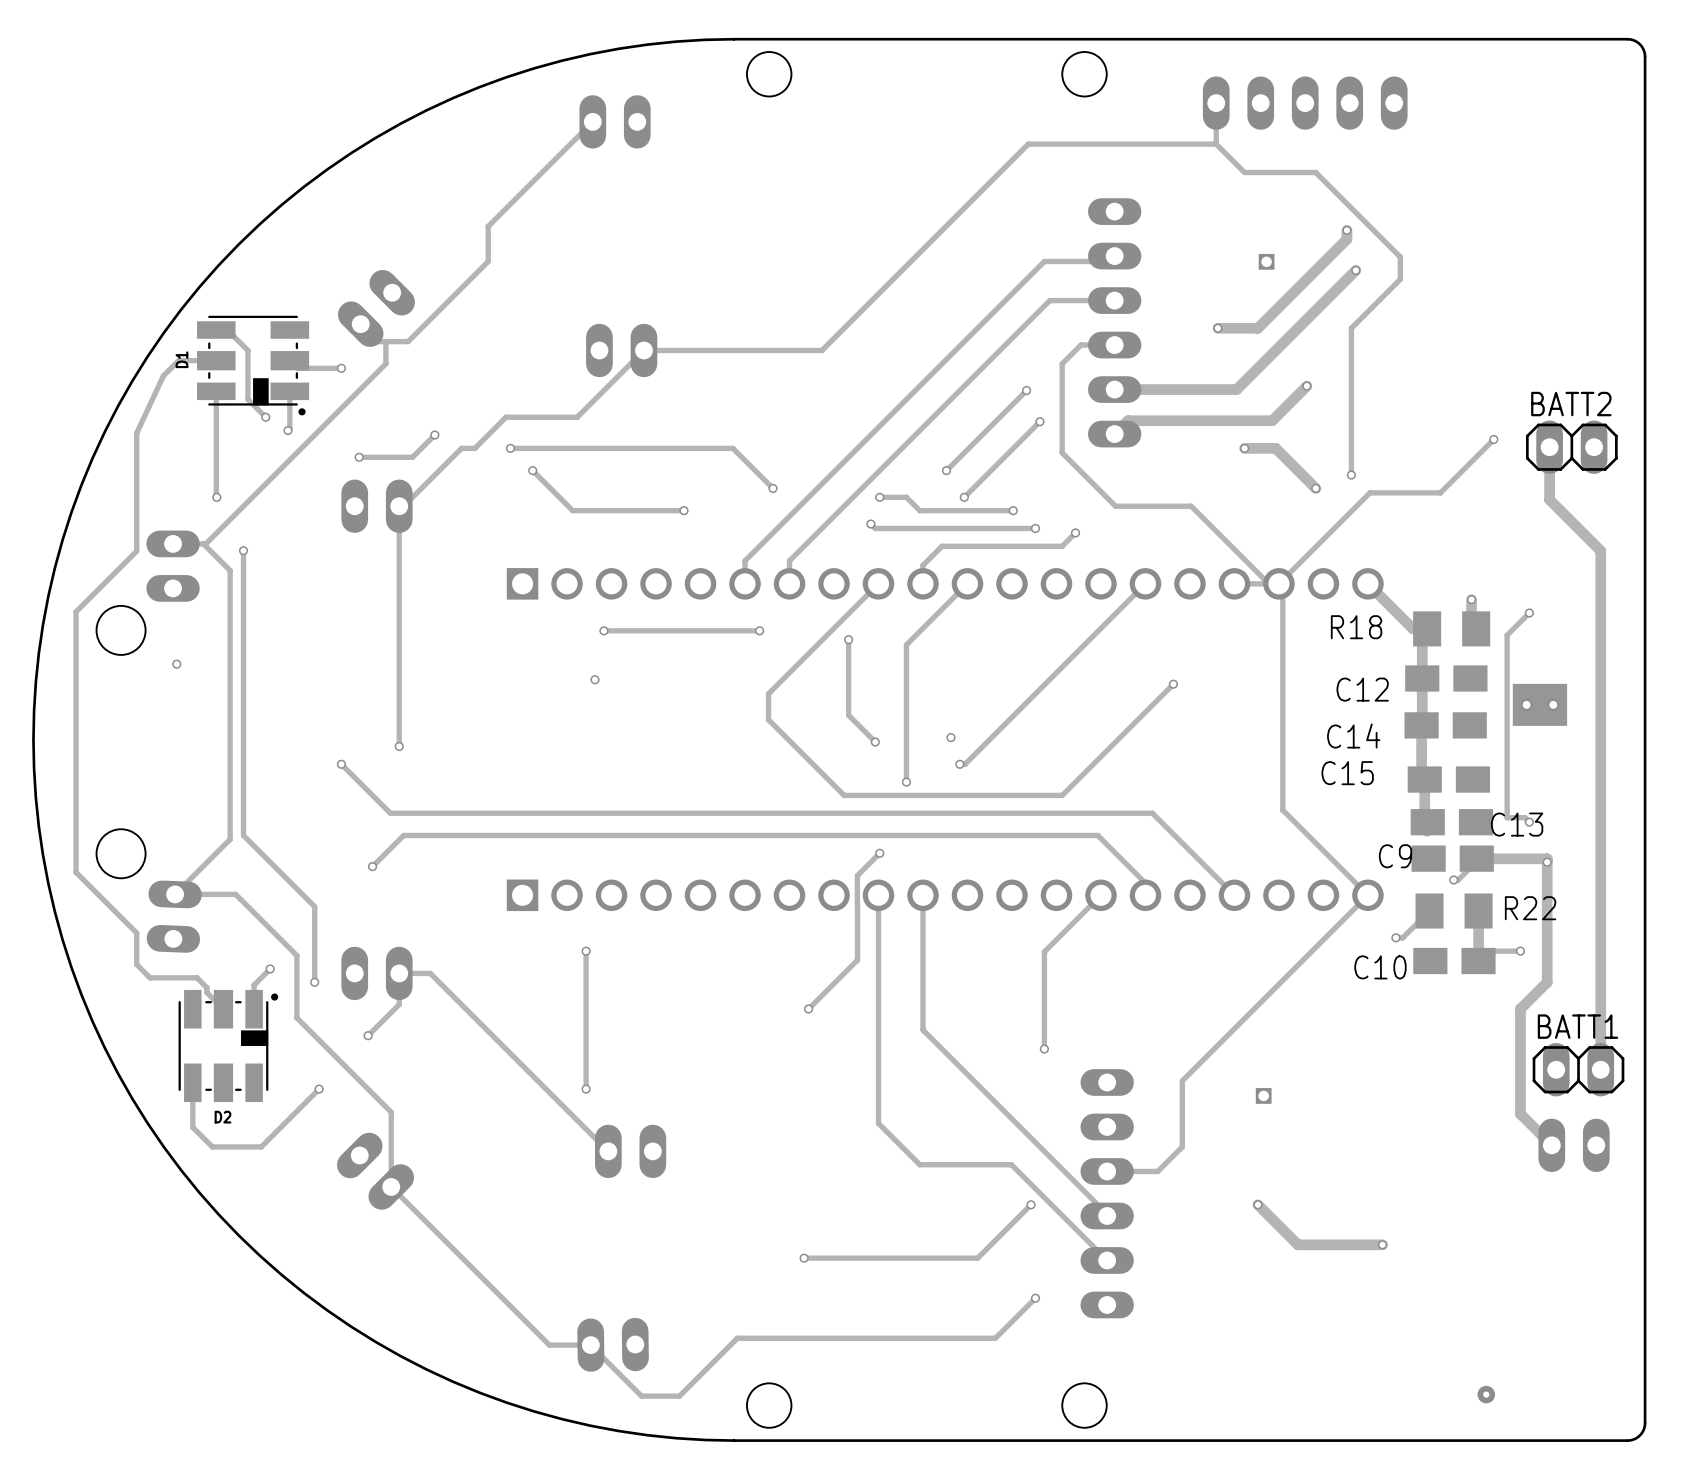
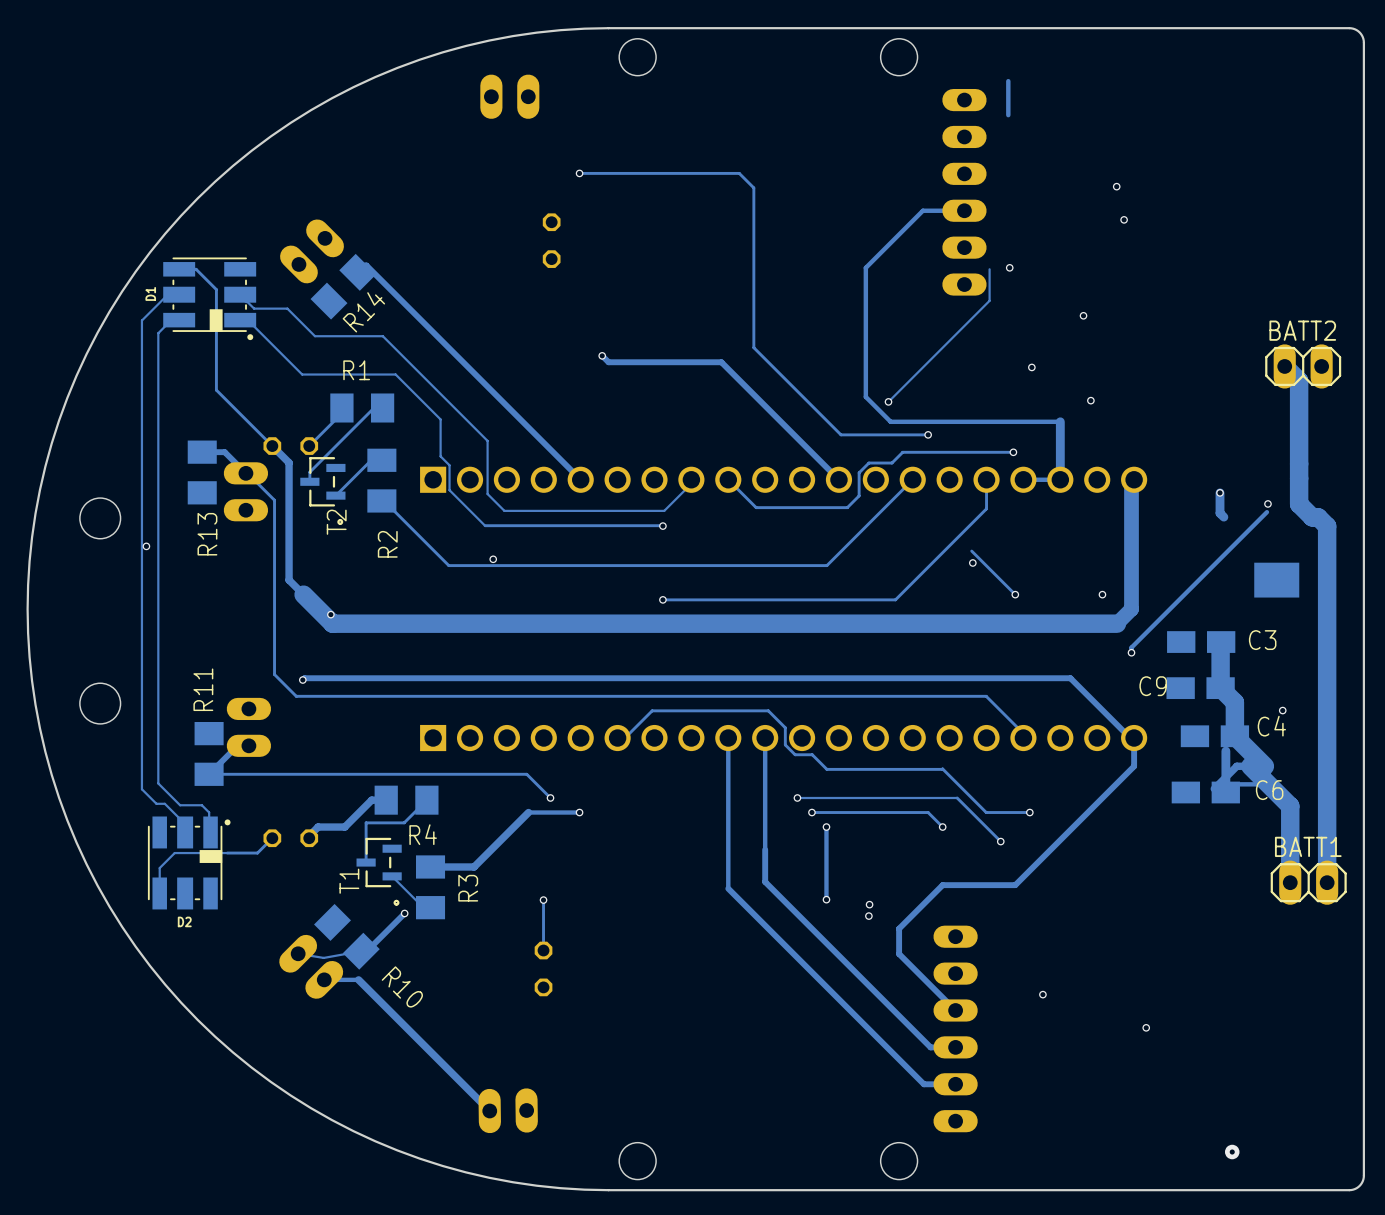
part: (1305, 103) -> none
track: (592, 121) (488, 226) (488, 261) (408, 341) (378, 341) (360, 324) -> none
track: none -> (579, 173) (739, 173) (753, 187) (753, 347) (841, 434) (928, 434)
via: none -> (579, 173)
track: (1346, 230) (1346, 239) (1257, 328) (1217, 328) -> none
track: (1114, 256) (1109, 261) (1044, 261) (745, 560) (745, 583) -> none
part: (1266, 261) -> none
track: (1355, 270) (1236, 389) (1114, 389) -> none
part: none -> (551, 240)
track: (1114, 300) (1049, 300) (789, 560) (789, 583) -> none
part position: (1114, 322) -> (964, 192)
track: none -> (352, 265) (366, 265) (580, 479)
track: (227, 330) (247, 350) (247, 399) (265, 417) -> (188, 269) (196, 269) (216, 289) (216, 390) (289, 462) (289, 580) (332, 623) (1116, 623) (1131, 609) (1131, 482) (1134, 479)
track: none -> (989, 269) (989, 300) (888, 401)
track: (385, 341) (385, 363) (205, 543) (173, 543) -> none
track: (1114, 345) (1080, 345) (1062, 363) (1062, 452) (1115, 506) (1191, 506) (1268, 583) -> none
part: (621, 350) -> none
R14: none -> (343, 286)
track: (216, 360) (178, 360) (163, 375) (136, 433) (136, 551) (76, 611) (76, 872) (136, 933) (136, 964) (150, 977) (197, 977) (206, 987) (206, 992) (223, 1009) -> (179, 294) (177, 296) (165, 296) (141, 320) (141, 789) (156, 803) (164, 803) (183, 821) (185, 832)
track: (341, 368) (297, 368) -> (691, 479) (691, 483) (664, 510) (504, 510) (487, 494) (487, 440) (382, 336) (314, 336) (287, 308) (254, 308) (246, 301)
via: (341, 368) -> none
track: (1306, 386) (1272, 420) (1128, 420) (1114, 434) -> none
track: (1026, 390) (946, 470) -> none
via: (1026, 390) -> none
track: (216, 391) (216, 497) -> (179, 320) (171, 320) (158, 333) (158, 783) (180, 805) (201, 805) (209, 812) (210, 832)
track: (289, 391) (289, 428) (288, 430) -> (240, 320) (247, 320) (302, 374) (395, 374) (440, 419) (440, 456) (449, 465) (449, 490) (485, 525) (662, 526)
via: (265, 417) -> none
track: (1039, 421) (964, 497) -> none
via: (1039, 421) -> none
via: (288, 430) -> none
track: none -> (602, 355) (608, 362) (721, 362) (838, 479)
via: none -> (602, 355)
track: (434, 435) (412, 457) (359, 457) -> none
via: (434, 435) -> none
track: (1493, 439) (1440, 492) (1369, 492) (1278, 583) -> (964, 210) (922, 210) (865, 267) (865, 396) (890, 421) (1060, 421) (1060, 479)
via: (1493, 439) -> none
track: (1549, 447) (1549, 499) (1600, 550) (1600, 639) -> (1284, 366) (1299, 380) (1299, 504) (1312, 517) (1318, 517) (1327, 526)
track: (510, 448) (732, 448) (772, 488) -> none
via: (510, 448) -> none
track: (1244, 448) (1275, 448) (1315, 488) -> none
via: (359, 457) -> none
track: (532, 470) (572, 510) (684, 510) -> none
via: (532, 470) -> none
via: (946, 470) -> none
track: (1351, 475) (1351, 328) (1400, 279) (1400, 257) (1315, 172) (1244, 172) (1216, 144) (1028, 144) (821, 350) (643, 350) (577, 417) (506, 417) (474, 448) (461, 448) (403, 506) (399, 506) (399, 746) -> none
via: (1351, 475) -> none
via: (772, 488) -> none
via: none -> (888, 401)
via: (216, 497) -> none
track: none -> (341, 408) (341, 413) (309, 446)
R1: none -> (362, 408)
track: none -> (382, 408) (374, 408) (309, 472) (309, 481)
track: (879, 497) (906, 497) (919, 510) (1013, 510) -> none
via: (879, 497) -> none
via: (964, 497) -> none
part: (376, 506) -> none
via: (684, 510) -> none
via: (1013, 510) -> none
track: (870, 524) (875, 528) (1035, 528) -> none
via: (870, 524) -> none
via: (1035, 528) -> none
via: none -> (928, 434)
track: (1075, 532) (1062, 546) (942, 546) (923, 565) (923, 583) -> none
via: (1075, 532) -> none
track: (203, 543) (230, 570) (230, 839) (175, 894) (235, 894) (296, 955) (296, 1017) (391, 1112) (391, 1186) (549, 1345) (590, 1345) -> none
part: none -> (290, 446)
track: (243, 550) (243, 835) (314, 906) (314, 982) -> none
via: (243, 550) -> none
via: none -> (1013, 452)
track: none -> (381, 460) (371, 460) (335, 495)
part: (173, 566) -> none
R13: none -> (202, 472)
track: (1282, 580) (1282, 810) (1367, 895) (1182, 1080) (1182, 1146) (1157, 1171) (1107, 1171) -> none
track: (878, 583) (768, 693) (768, 719) (844, 795) (1062, 795) (1173, 684) -> (728, 479) (756, 507) (847, 507) (859, 495) (859, 472) (868, 463) (892, 463) (902, 452) (1013, 452)
track: (967, 583) (906, 644) (906, 782) -> none
track: none -> (912, 479) (826, 565) (448, 565) (384, 500) (381, 500)
track: (1145, 583) (965, 764) (959, 764) -> none
track: none -> (986, 479) (986, 508) (895, 599) (662, 599)
track: (1367, 583) (1412, 628) (1427, 628) (1422, 633) (1421, 725) (1421, 776) (1424, 779) (1424, 828) (1427, 831) (1427, 822) -> none
R2: none -> (381, 480)
T2: none -> (322, 491)
part: none -> (245, 491)
track: (1529, 613) (1507, 635) (1507, 817) (1524, 817) (1529, 822) -> none
track: none -> (1266, 512) (1131, 647) (1131, 652)
R18: (1451, 628) -> none
via: (603, 630) -> none
track: (759, 630) (603, 630) -> none
via: (759, 630) -> none
via: none -> (662, 526)
track: (848, 639) (848, 715) (875, 742) -> none
via: (848, 639) -> none
track width: thin (1600, 639) (1600, 1069) -> thick (1327, 526) (1327, 882)
track: none -> (971, 551) (1015, 594)
C12: (1446, 678) -> none
part footprint: [1512, 683, 1568, 726] -> [1254, 562, 1300, 598]
via: none -> (1015, 594)
via: none -> (1102, 594)
C14: (1445, 725) -> none
via: none -> (662, 599)
via: (950, 737) -> none
via: (875, 742) -> none
track: (341, 764) (390, 813) (1152, 813) (1234, 895) -> (202, 452) (224, 452) (274, 500) (274, 674) (296, 696) (986, 696) (1023, 733) (1023, 738)
via: (341, 764) -> none
via: (959, 764) -> none
C15 name: C15 (1347, 773) -> C3 (1262, 640)
via: (906, 782) -> none
track: none -> (1216, 644) (1220, 648) (1220, 688) (1234, 702) (1234, 736) (1264, 766) (1236, 766) (1214, 788)
via: none -> (1131, 652)
C13: (1451, 822) -> none
via: (1529, 822) -> none
track: none -> (302, 680) (304, 678) (1070, 678) (1130, 738) (1134, 738) (1134, 766) (1015, 885) (942, 885) (899, 928) (899, 953) (955, 1010)
via: none -> (302, 680)
track: (879, 853) (857, 875) (857, 960) (808, 1009) -> none
via: (879, 853) -> none
C9 position: (1452, 858) -> (1200, 688)
track: (372, 866) (403, 835) (1097, 835) (1145, 883) (1145, 895) -> none
via: (372, 866) -> none
track: (1453, 879) (1458, 879) (1479, 858) (1547, 858) (1547, 982) (1520, 1009) (1520, 1114) (1551, 1145) -> none
via: (1453, 879) -> none
C4: none -> (1214, 736)
track: none -> (617, 738) (625, 738) (652, 710) (768, 710) (785, 727) (785, 744) (795, 754) (812, 754) (826, 769) (942, 768) (986, 812) (1029, 812)
track: (1100, 895) (1044, 951) (1044, 1049) -> none
track: none -> (248, 745) (237, 745) (209, 774) (526, 774) (550, 797)
track: (1429, 911) (1402, 937) (1395, 937) -> none
R22: (1454, 911) -> none
R11: none -> (209, 753)
part: (174, 916) -> none
track: none -> (1250, 766) (1290, 806) (1290, 882)
via: (1395, 937) -> none
track: (586, 951) (586, 1089) -> none
via: (586, 951) -> none
via: (1520, 951) -> none
via: none -> (550, 797)
track: none -> (797, 797) (957, 797) (1000, 841)
via: none -> (797, 797)
C10 name: C10 (1380, 967) -> C6 (1269, 790)
track: (270, 968) (254, 985) (254, 1009) -> none
via: (270, 968) -> none
track: none -> (386, 800) (371, 800) (344, 827) (318, 827) (309, 838)
R4: none -> (406, 800)
track: none -> (426, 800) (404, 822) (366, 822) (366, 862)
part rotation: 0° (376, 973) -> 90° clockwise (248, 727)
part position: (376, 973) -> (248, 727)
via: (314, 982) -> none
track: none -> (579, 812) (528, 812) (474, 866) (430, 866)
via: none -> (579, 812)
track: none -> (811, 812) (928, 812) (942, 827)
via: none -> (811, 812)
via: none -> (1029, 812)
track: none -> (826, 827) (826, 899)
via: none -> (826, 827)
via: none -> (942, 827)
via: (808, 1009) -> none
part: none -> (290, 838)
via: none -> (1000, 841)
track: (923, 1029) (1107, 1215) -> (765, 849) (765, 881) (930, 1047) (955, 1047)
track: (368, 1035) (399, 1004) (399, 973) (430, 973) (608, 1151) -> none
via: (368, 1035) -> none
via: (1044, 1049) -> none
T1: none -> (379, 871)
track: none -> (392, 876) (423, 907) (430, 907)
R3: none -> (430, 887)
track: (878, 1076) (878, 1123) (919, 1164) (1011, 1164) (1107, 1260) -> (728, 888) (923, 1084) (955, 1084)
track: (192, 1082) (192, 1127) (212, 1146) (261, 1146) (319, 1089) -> (159, 893) (159, 868) (174, 853) (257, 853) (272, 838)
via: (319, 1089) -> none
via: (586, 1089) -> none
track: none -> (543, 900) (543, 950)
via: none -> (543, 900)
via: none -> (826, 899)
part: (1263, 1095) -> none
via: none -> (869, 904)
track: none -> (404, 913) (364, 953) (349, 953)
via: none -> (404, 913)
via: none -> (868, 916)
R10: none -> (346, 936)
part: (1574, 1145) -> none
part: (630, 1151) -> none
track: none -> (361, 951) (323, 957) (298, 953)
part: none -> (543, 968)
part position: (1107, 1193) -> (955, 1028)
track: (1031, 1204) (977, 1258) (804, 1258) -> none
via: (1031, 1204) -> none
track: (1257, 1204) (1298, 1244) (1382, 1244) -> none
via: (804, 1258) -> none
track: (1035, 1298) (995, 1338) (737, 1338) (679, 1396) (641, 1396) (590, 1345) -> (324, 979) (358, 979) (489, 1111)
via: (1035, 1298) -> none

